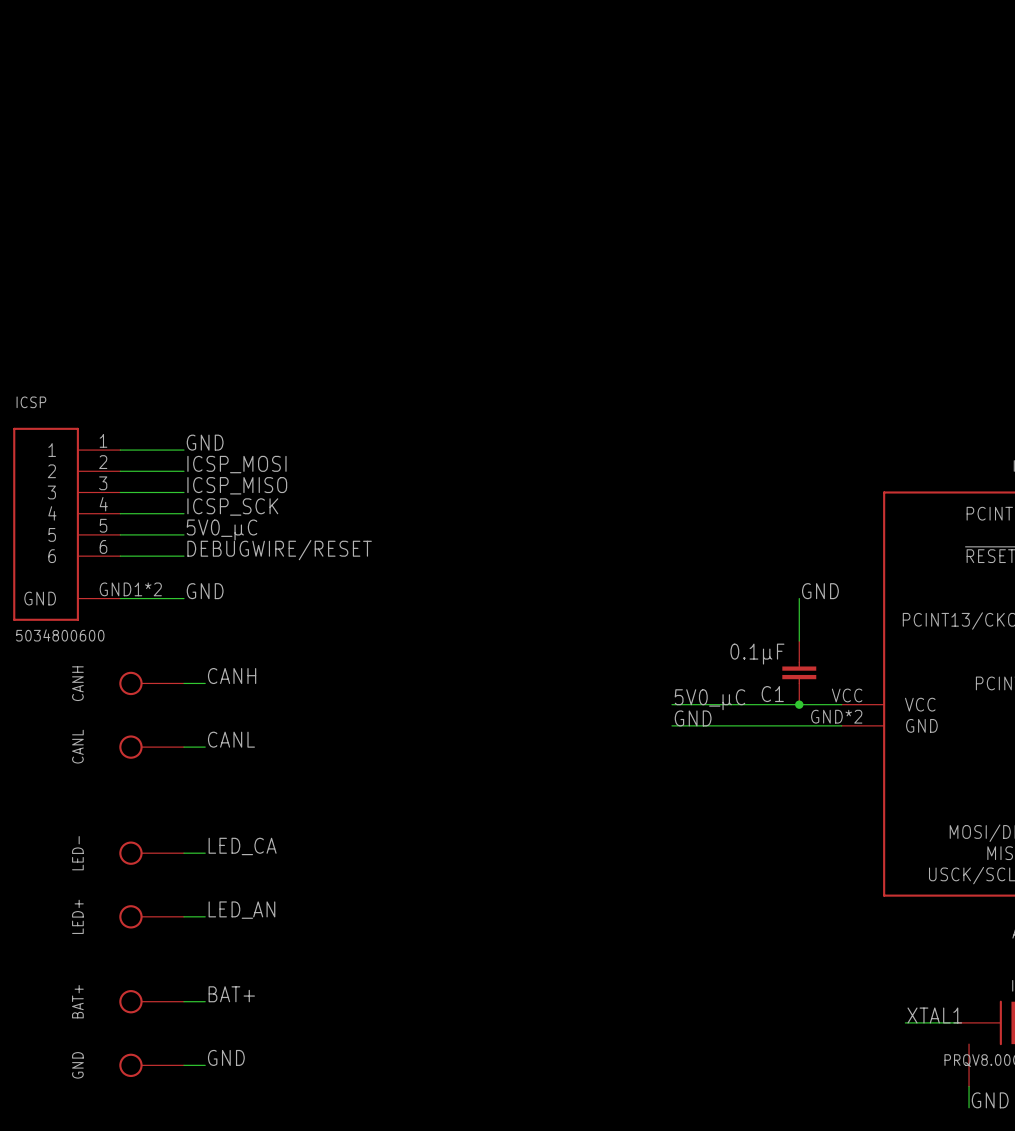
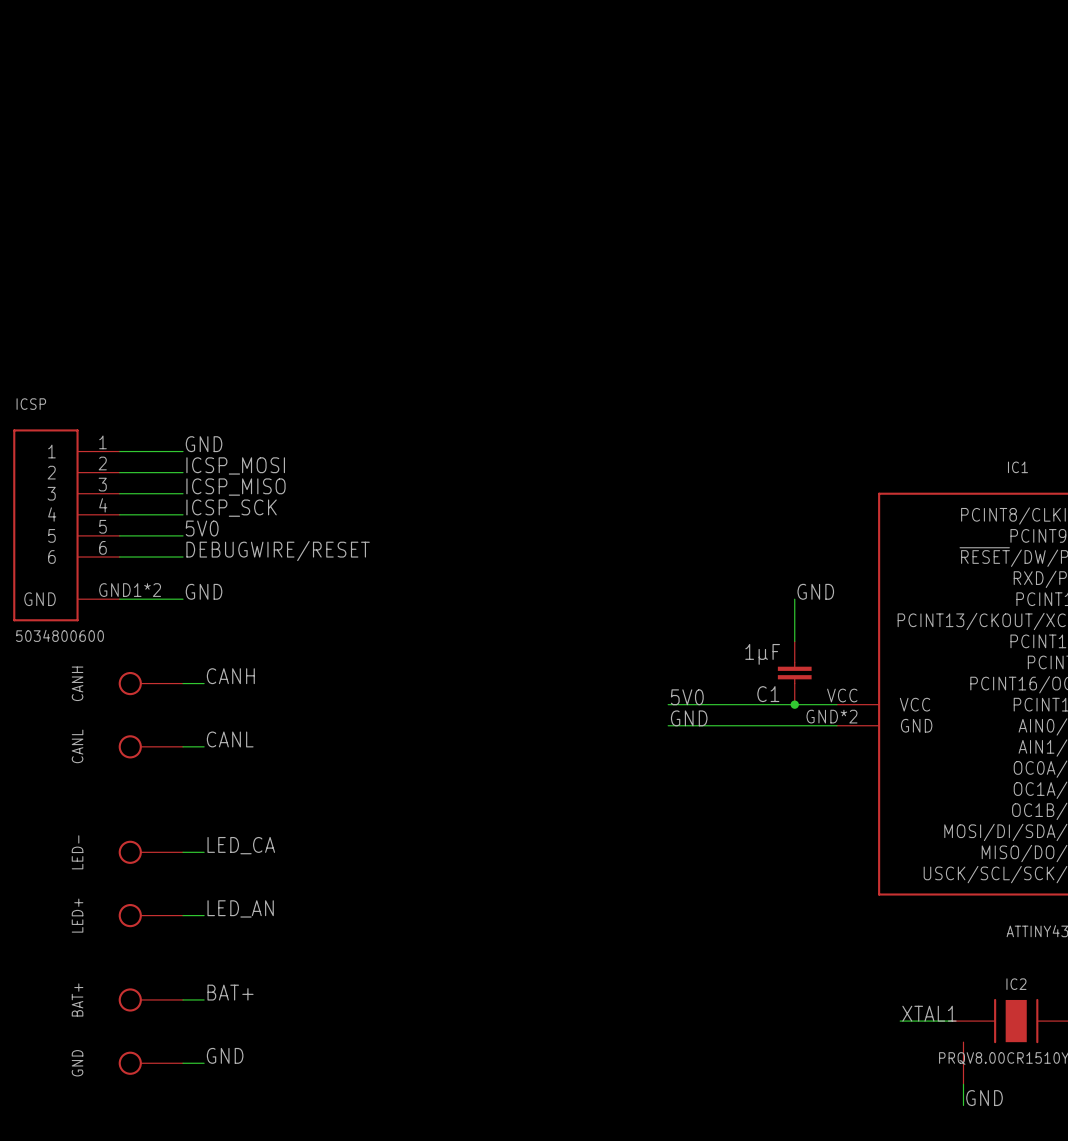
label: 5V0_μC (222, 529) -> 5V0 (202, 528)
C1 value: 0.1μF (757, 654) -> 1μF (762, 654)
label: 5V0_μC (710, 699) -> 5V0 (687, 697)

